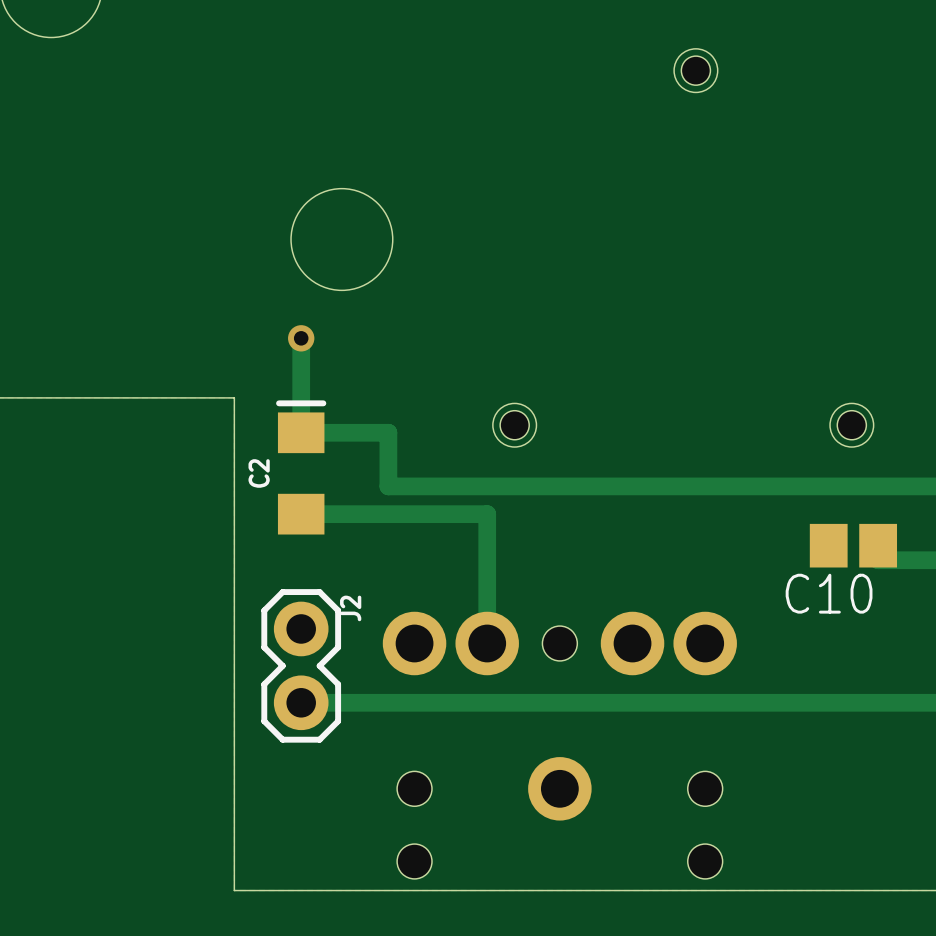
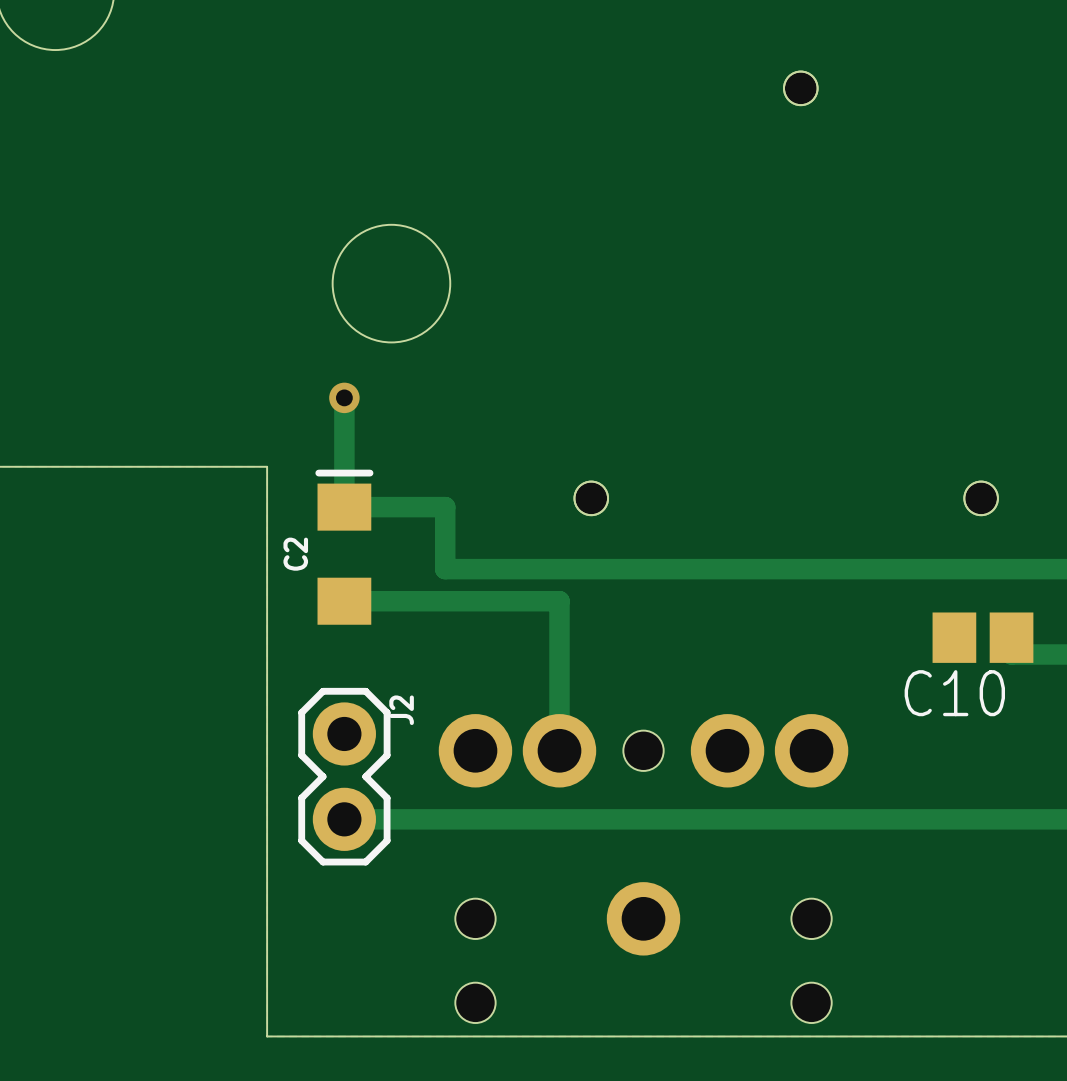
part footprint: [674, 48, 718, 93] -> [784, 71, 818, 106]
part footprint: [492, 403, 537, 448] -> [574, 481, 609, 516]
part footprint: [830, 403, 874, 448] -> [964, 481, 998, 516]

